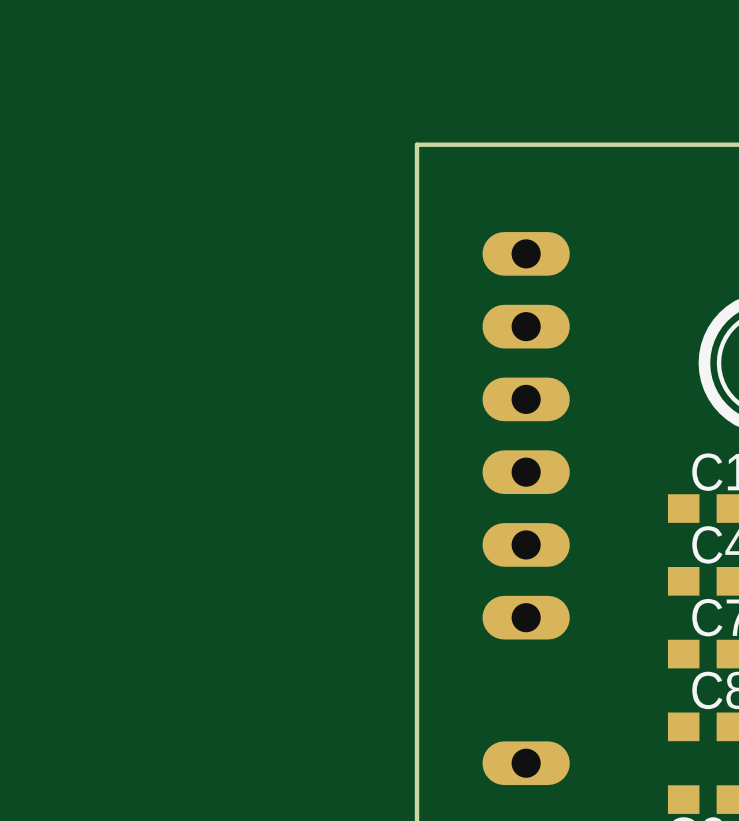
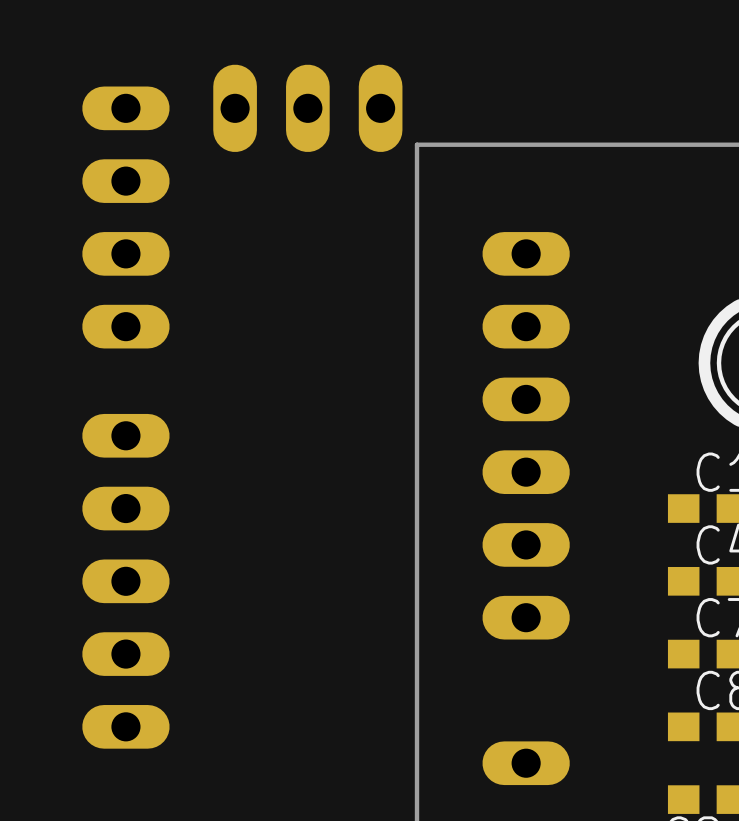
part: none -> (307, 108)
part: none -> (125, 217)
part: none -> (125, 581)

